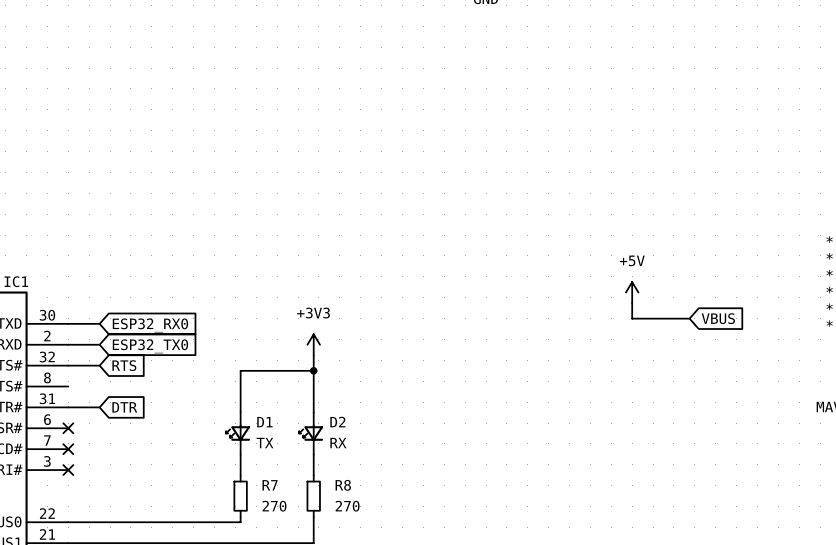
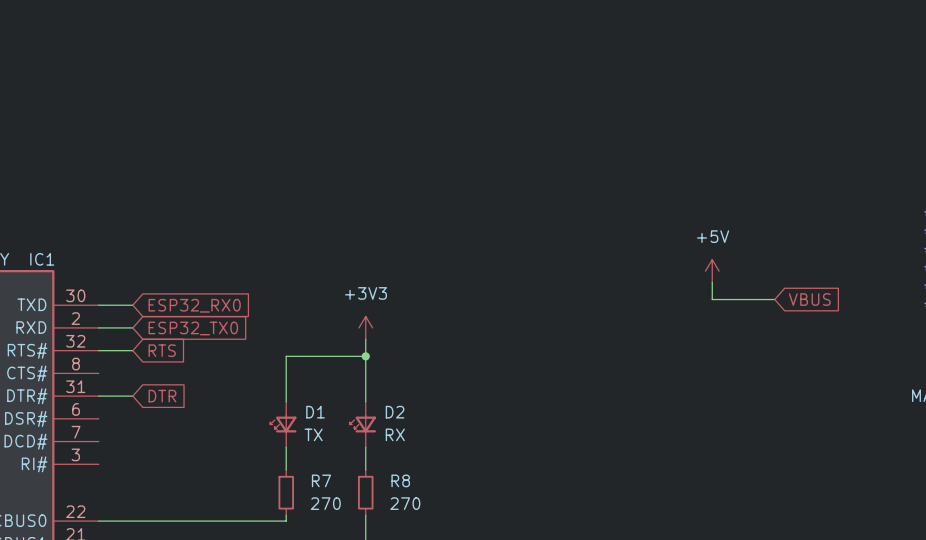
no-connect mark: (68, 428) -> none
no-connect mark: (68, 449) -> none
no-connect mark: (68, 470) -> none

